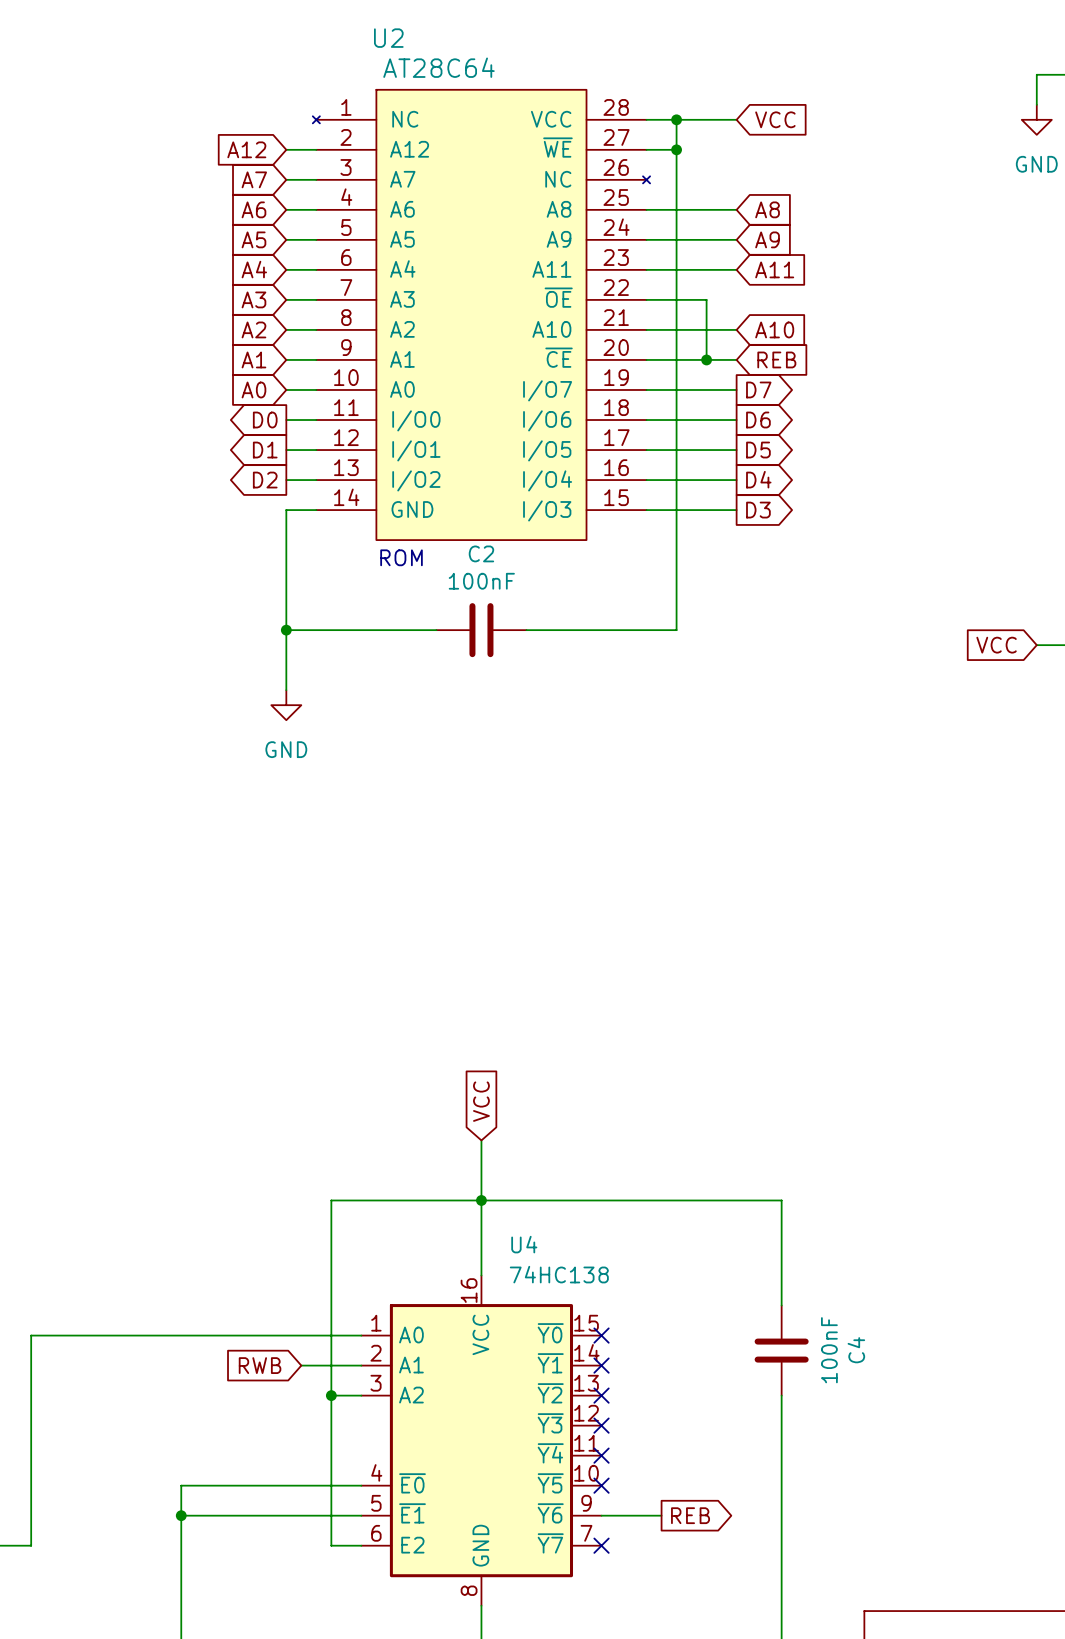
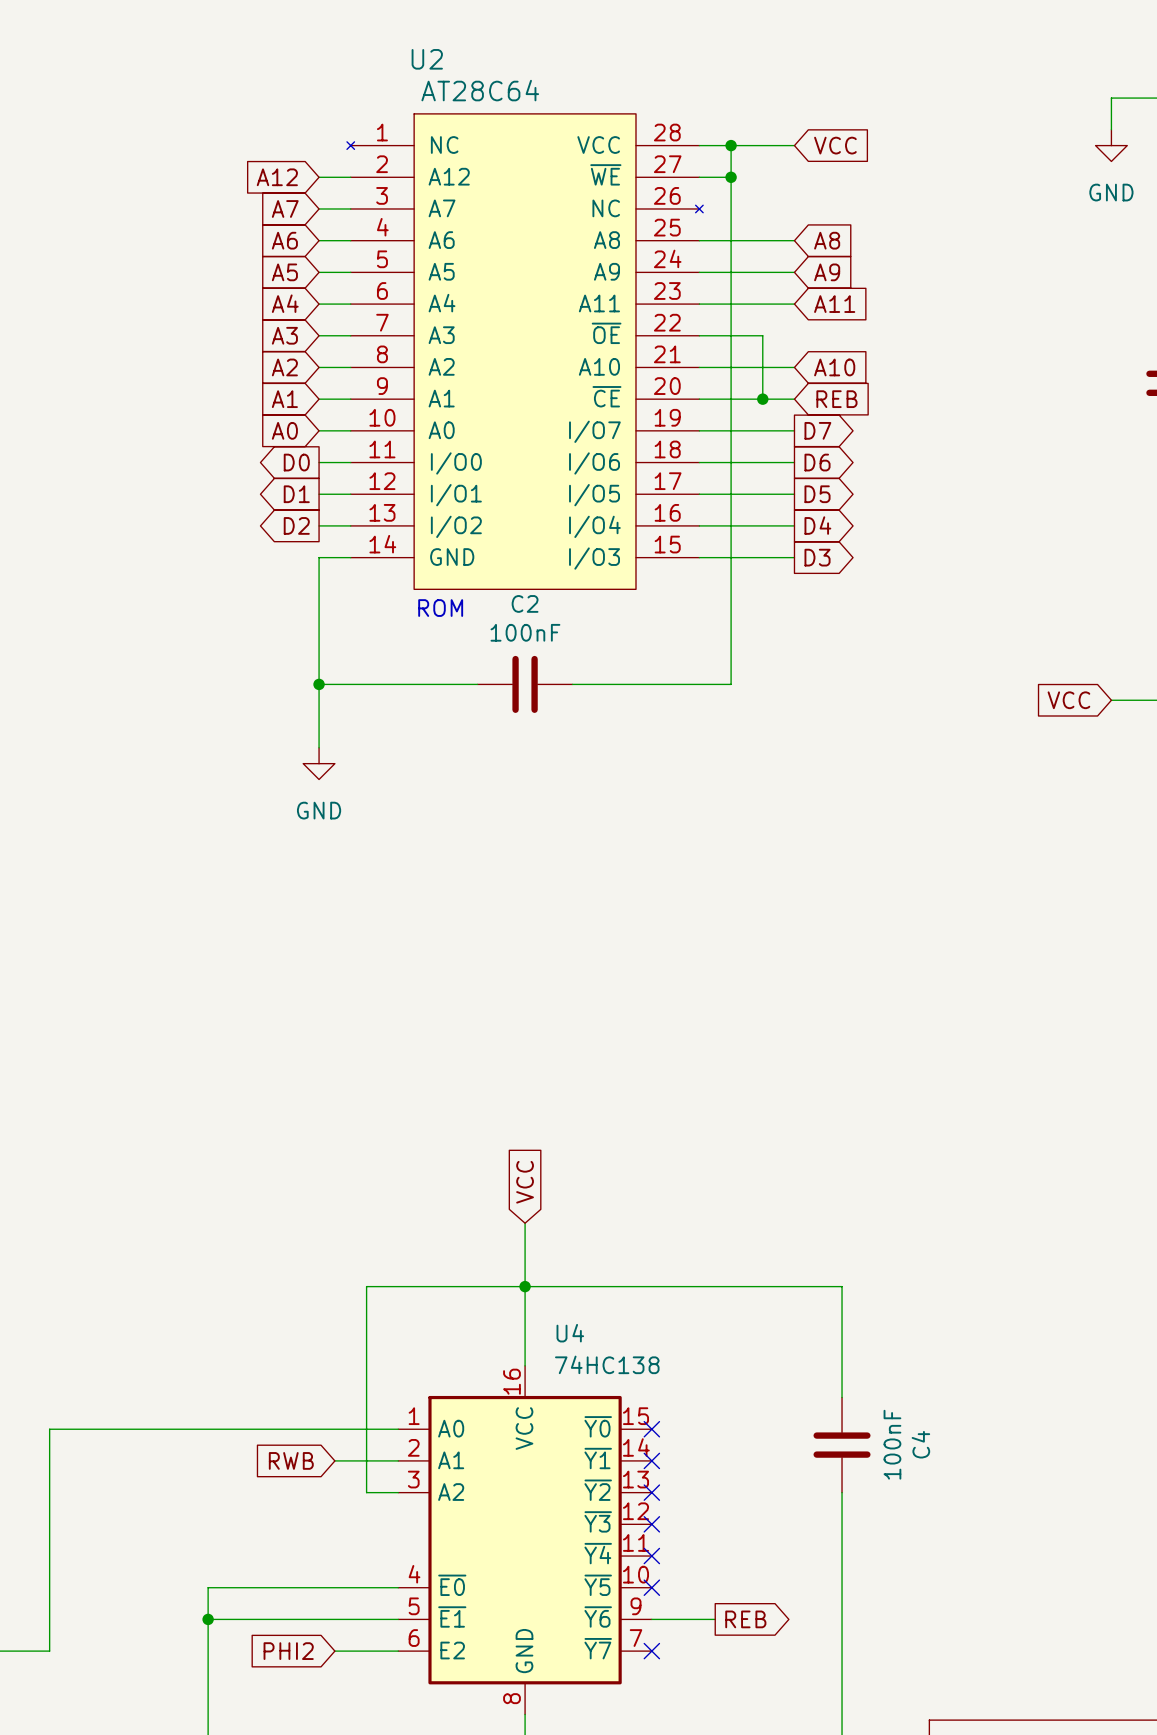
wire: (331, 1395) (331, 1545) -> (334, 1651) (366, 1651)
junction: (331, 1395) -> none
global label: none -> PHI2 (288, 1651)

